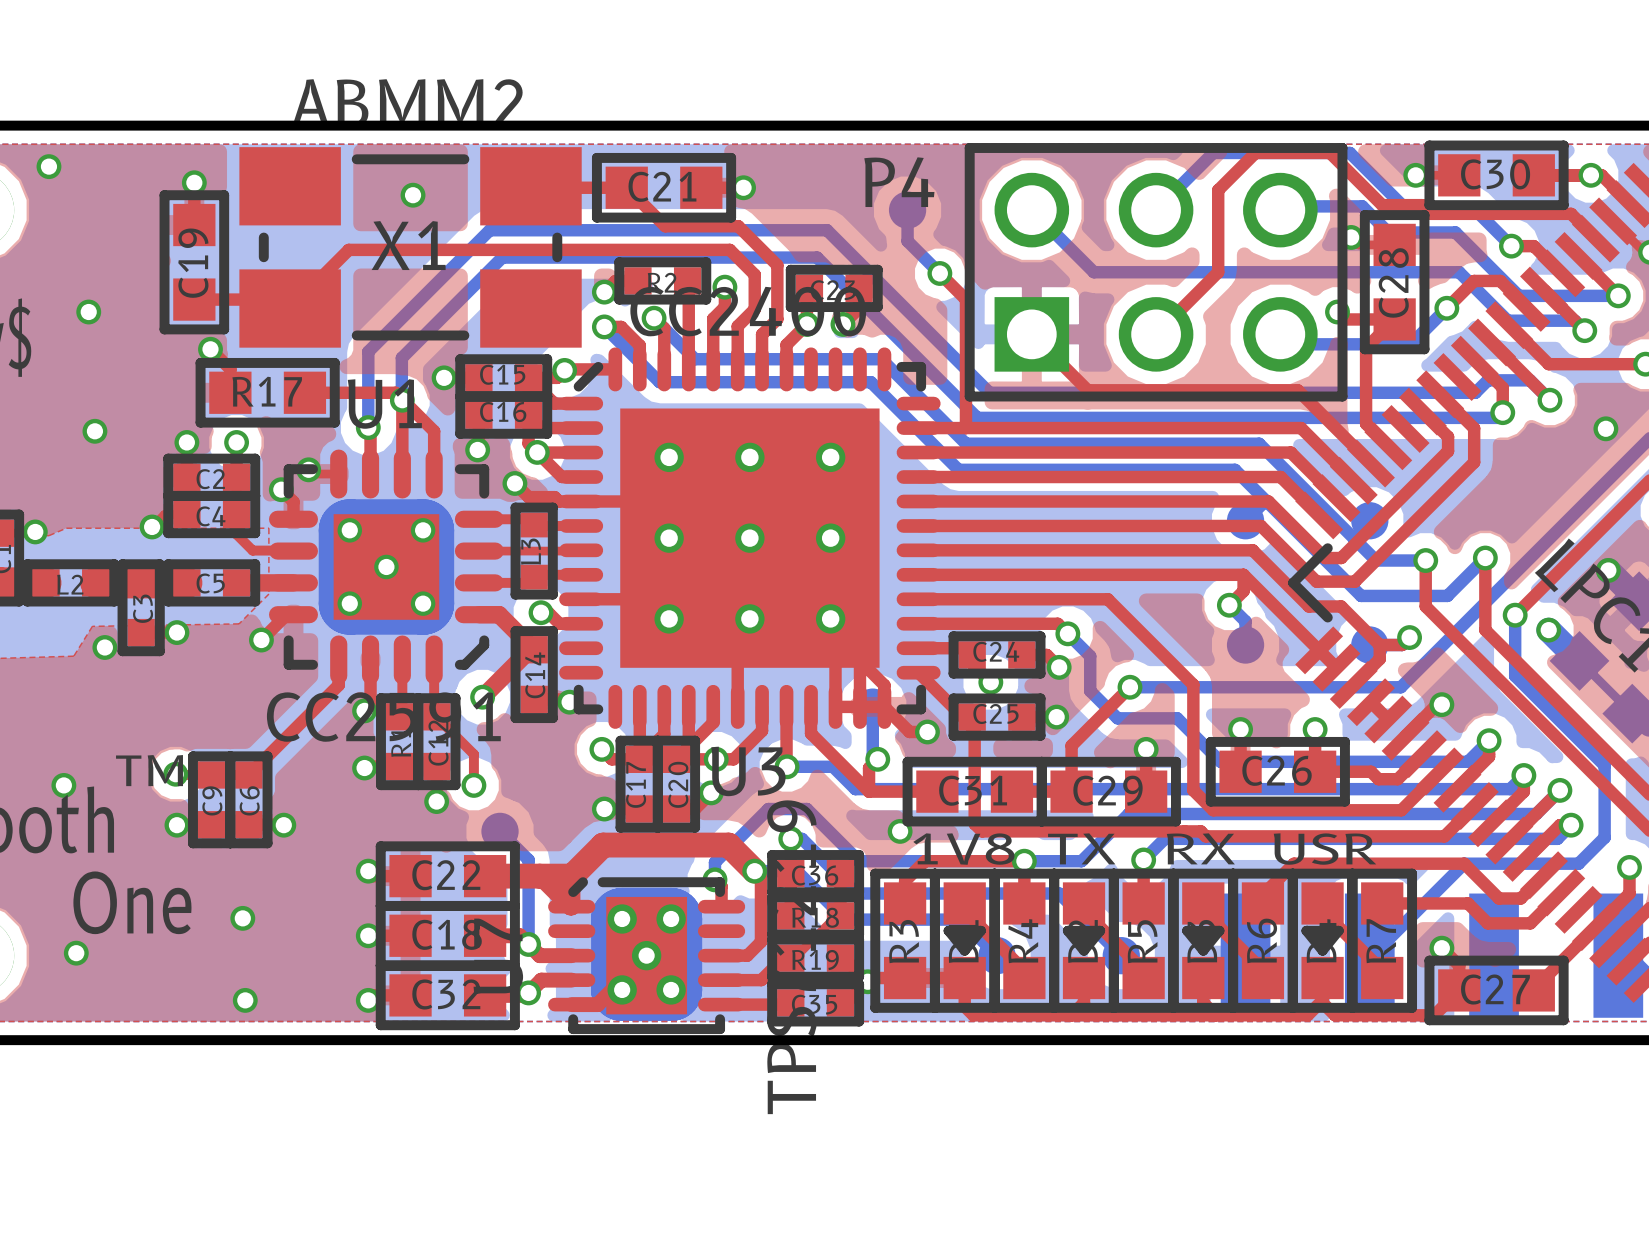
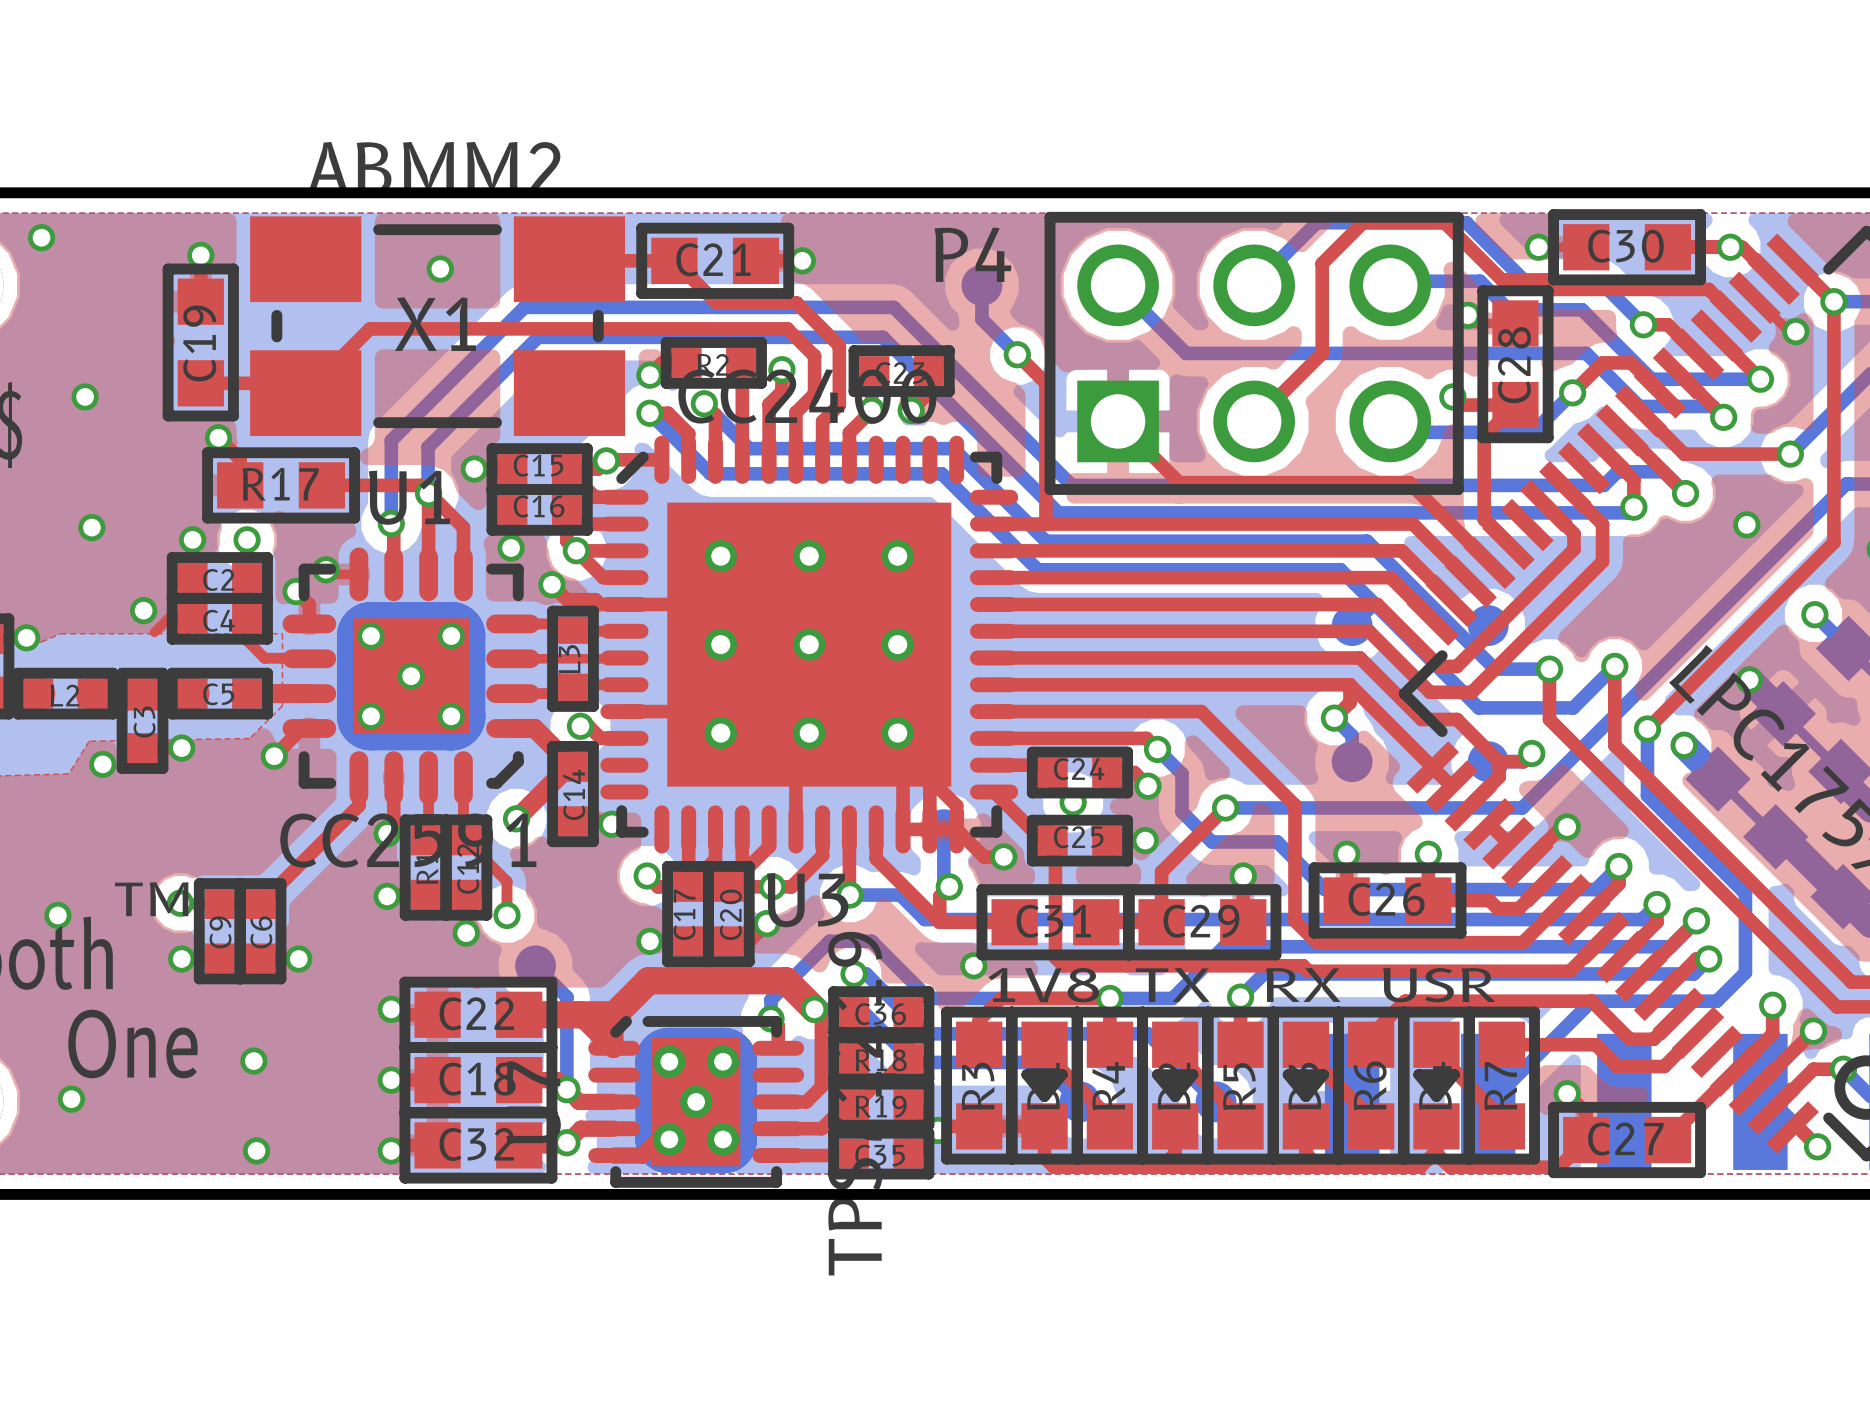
via position: (152, 526) -> (143, 610)

